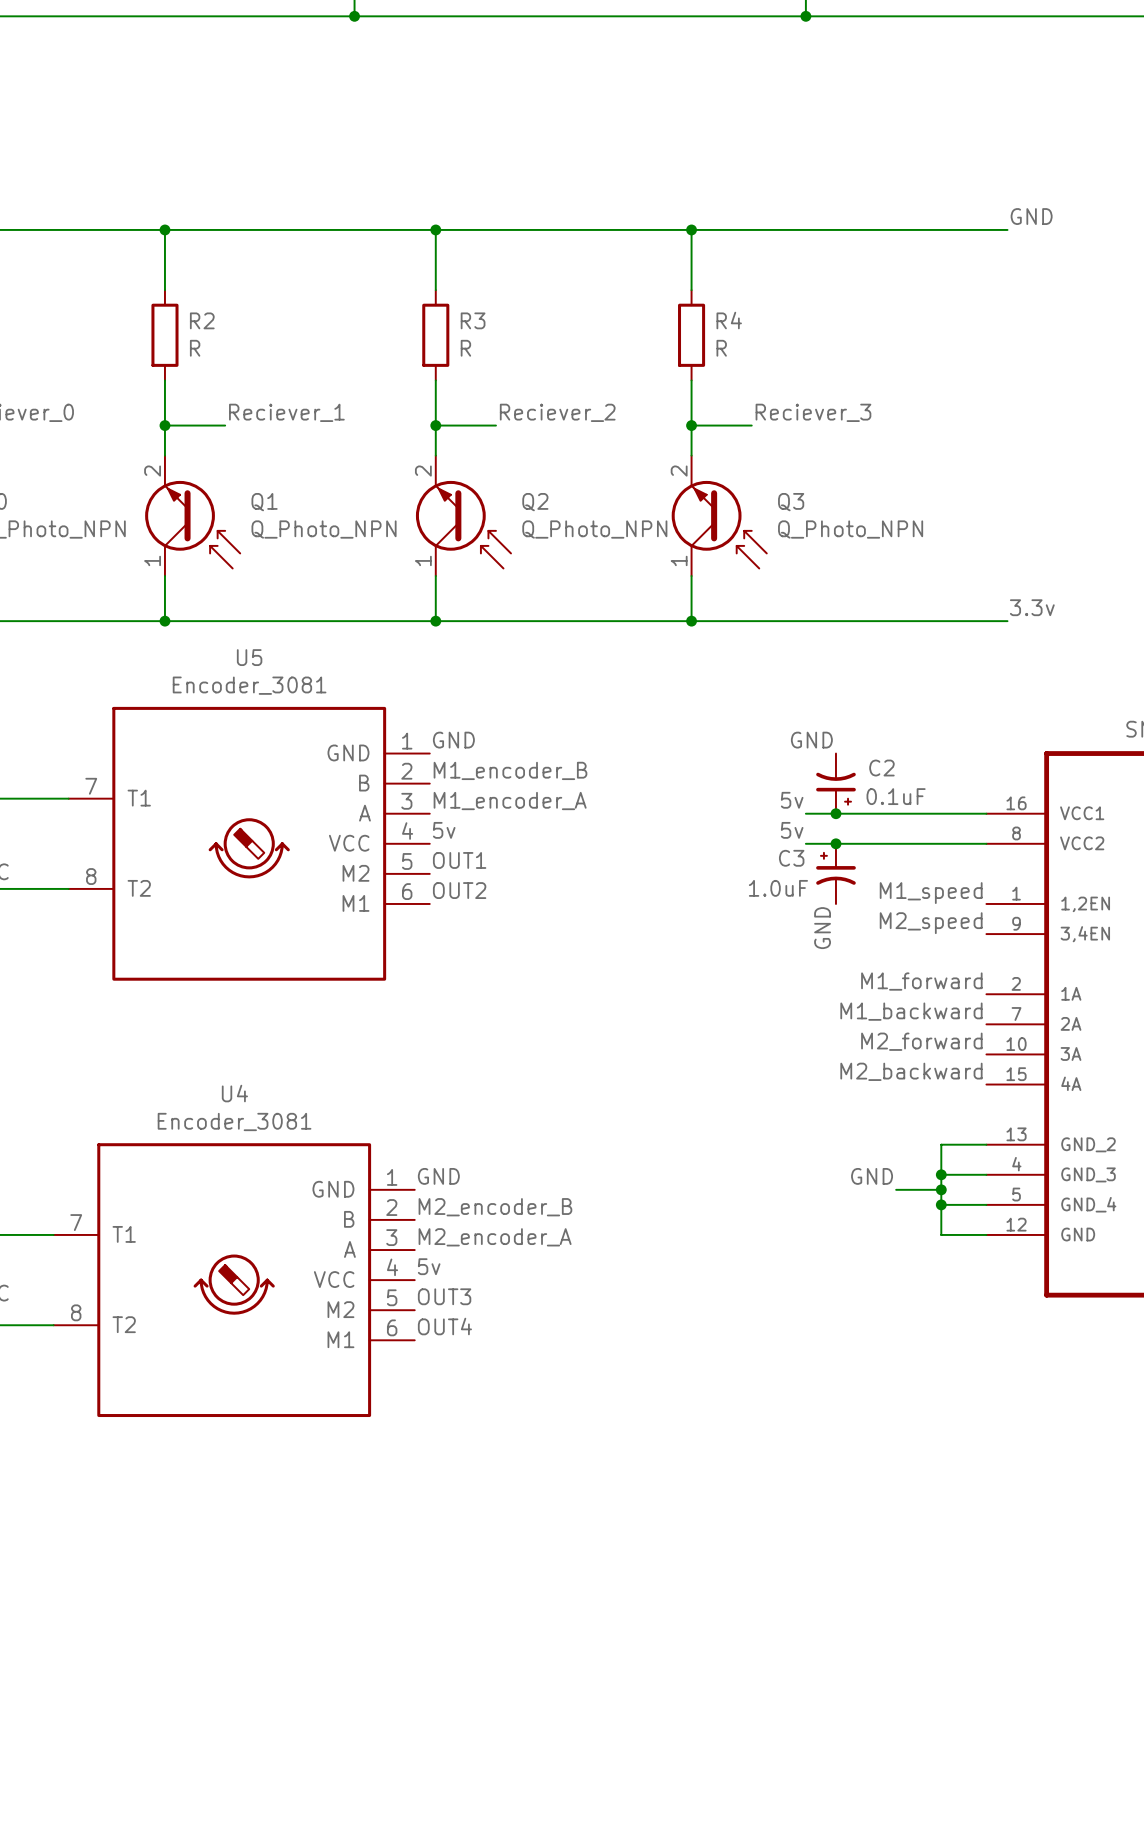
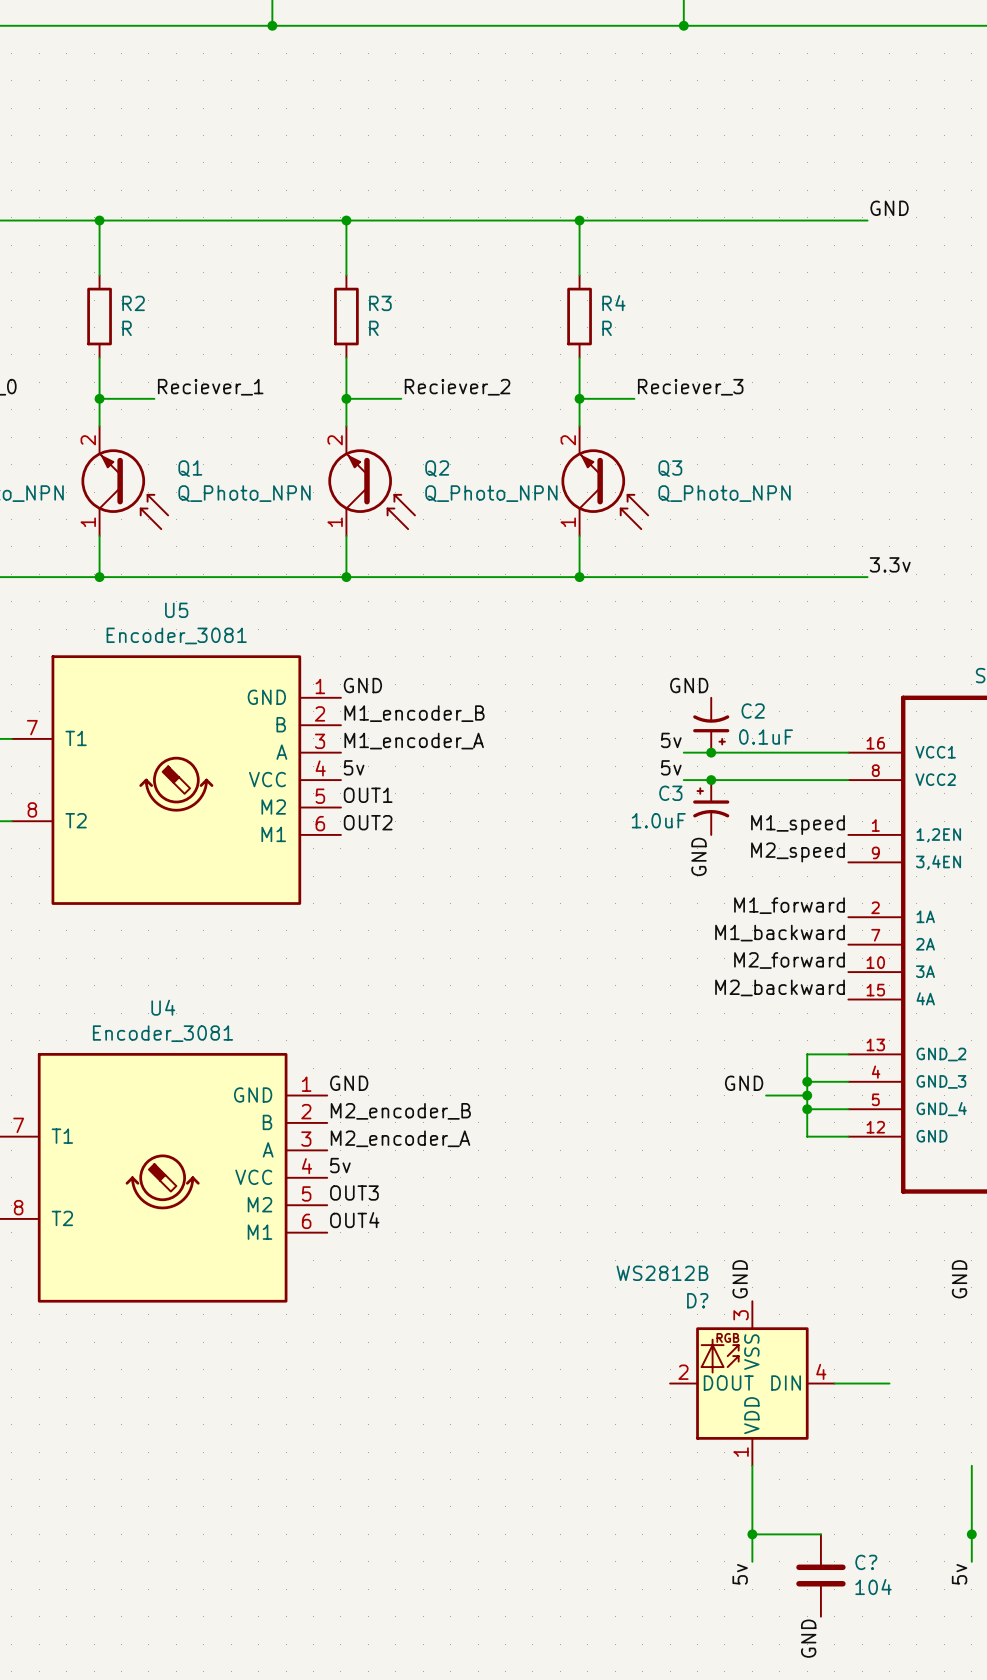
label: none -> GND (740, 1279)
label: none -> GND (959, 1279)
D?: none -> WS2812B (752, 1383)
wire: none -> (834, 1383) (889, 1383)
wire: none -> (752, 1465) (752, 1561)
wire: none -> (971, 1465) (971, 1561)
wire: none -> (752, 1534) (820, 1534)
junction: none -> (752, 1534)
junction: none -> (971, 1534)
label: none -> 5v (740, 1574)
label: none -> 5v (959, 1574)
C?: none -> 104 (820, 1575)
label: none -> GND (808, 1638)

